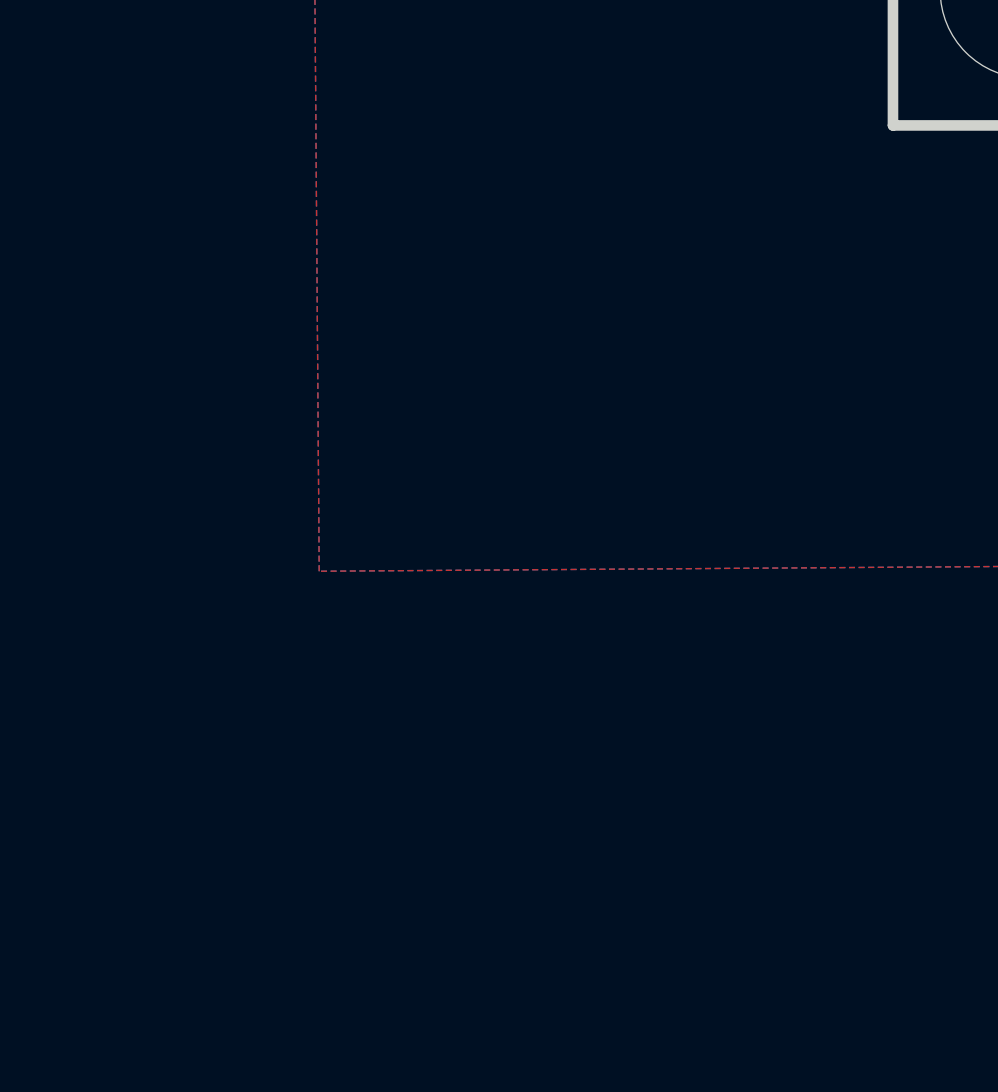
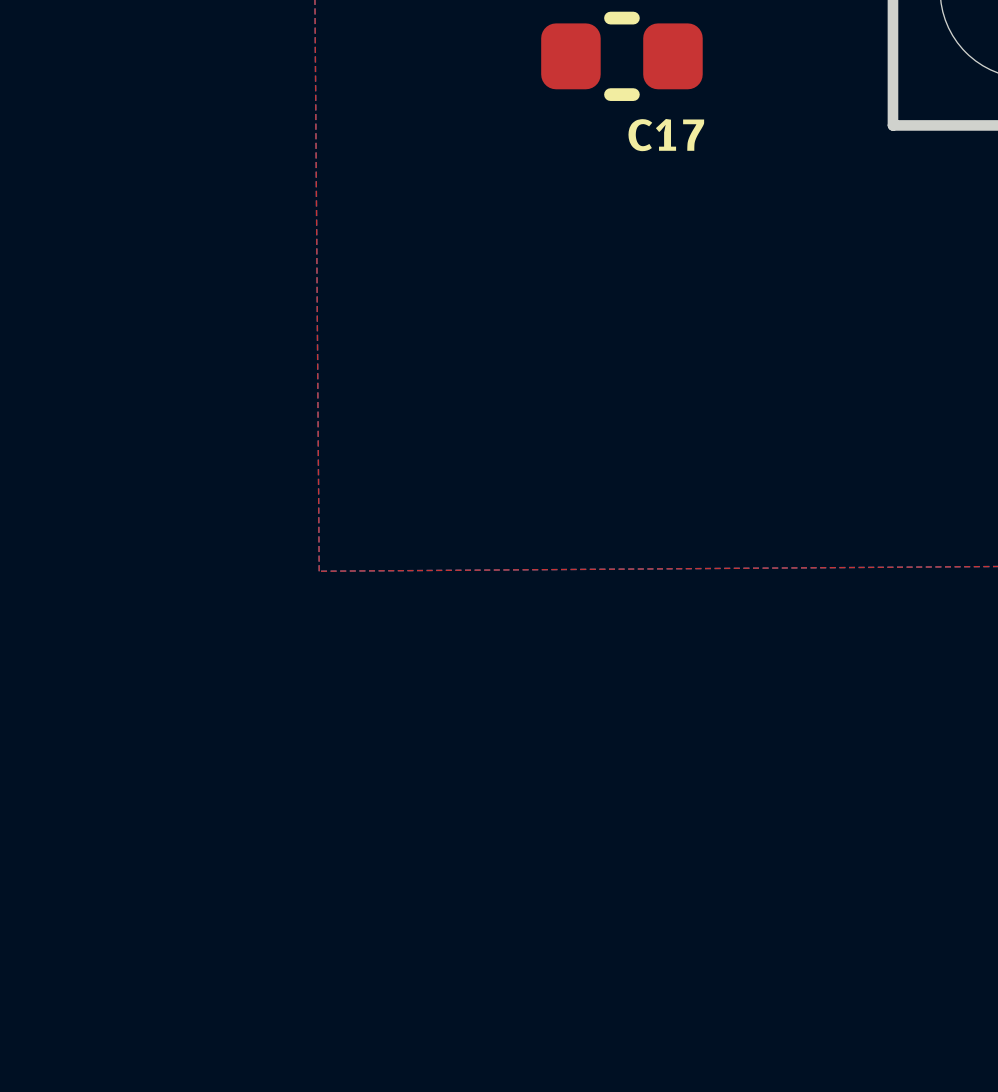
C17: none -> (621, 56)

